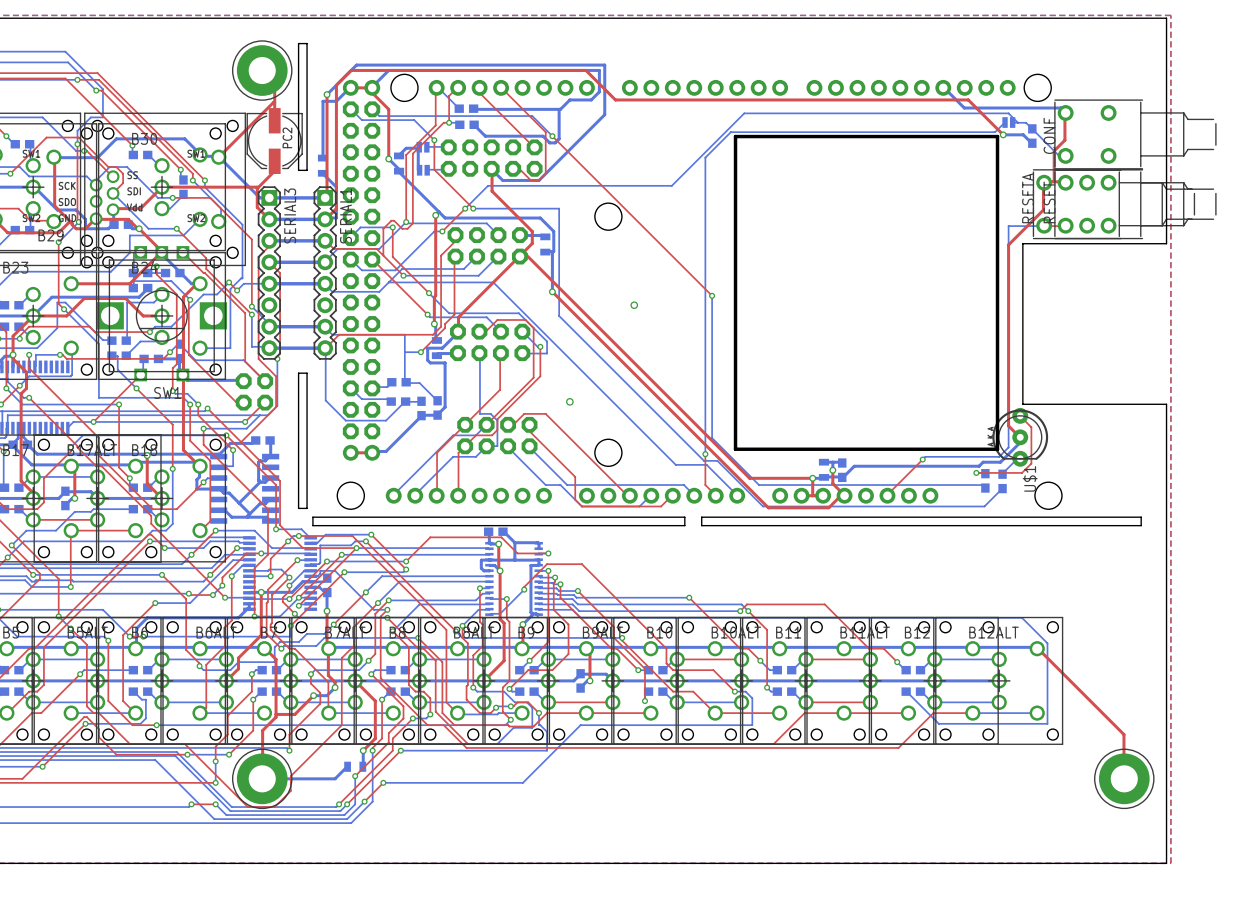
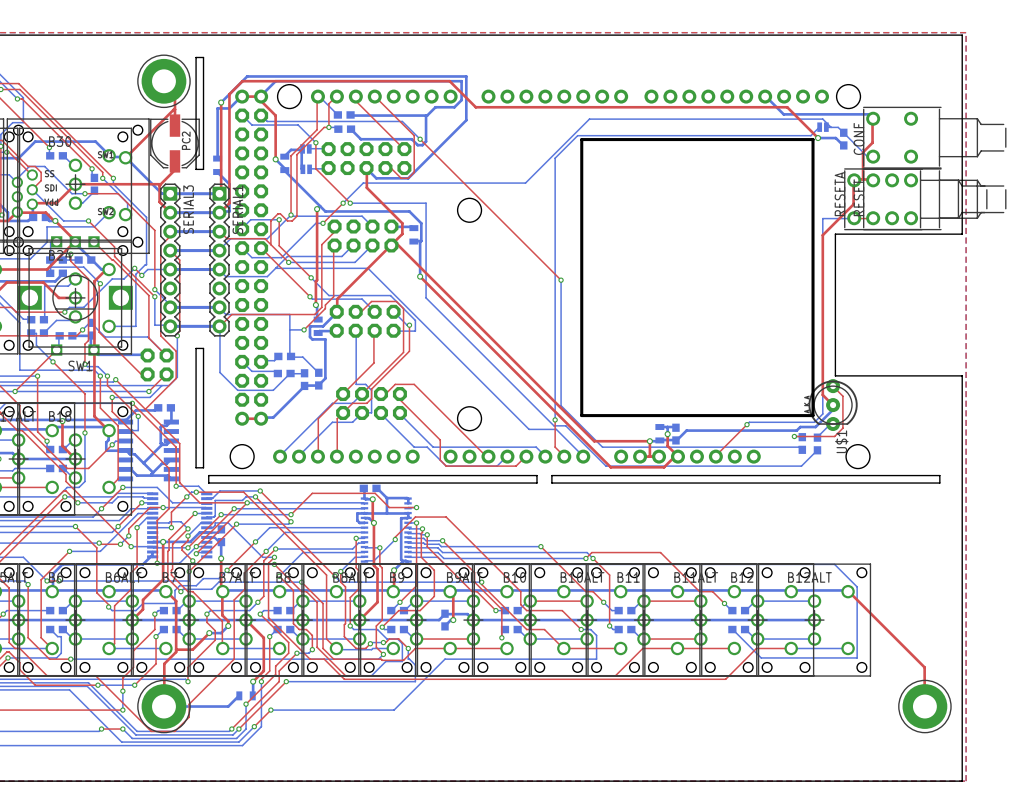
via: (634, 305) -> none
via: (569, 401) -> none

